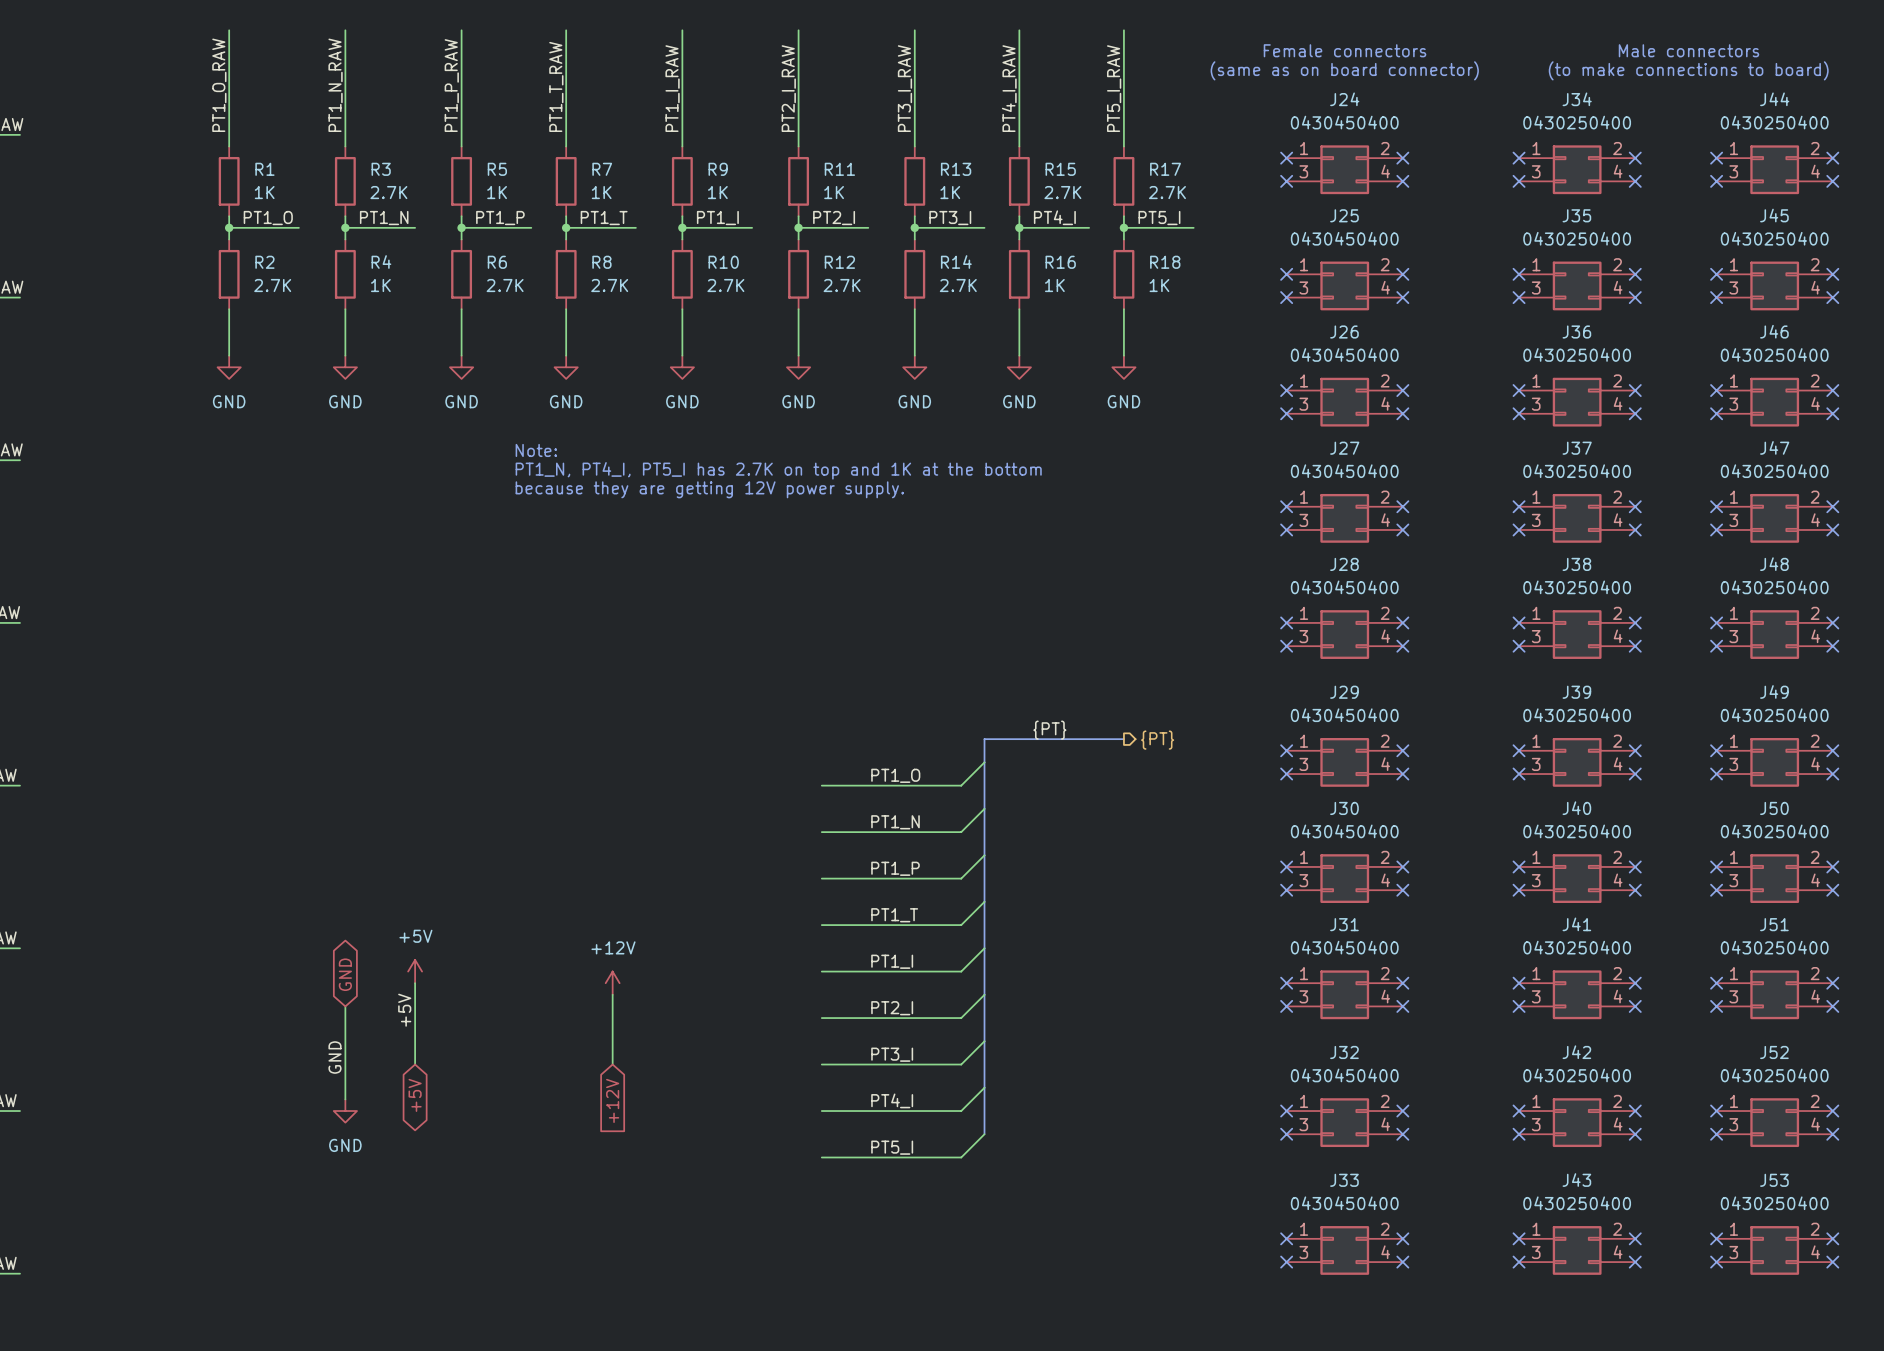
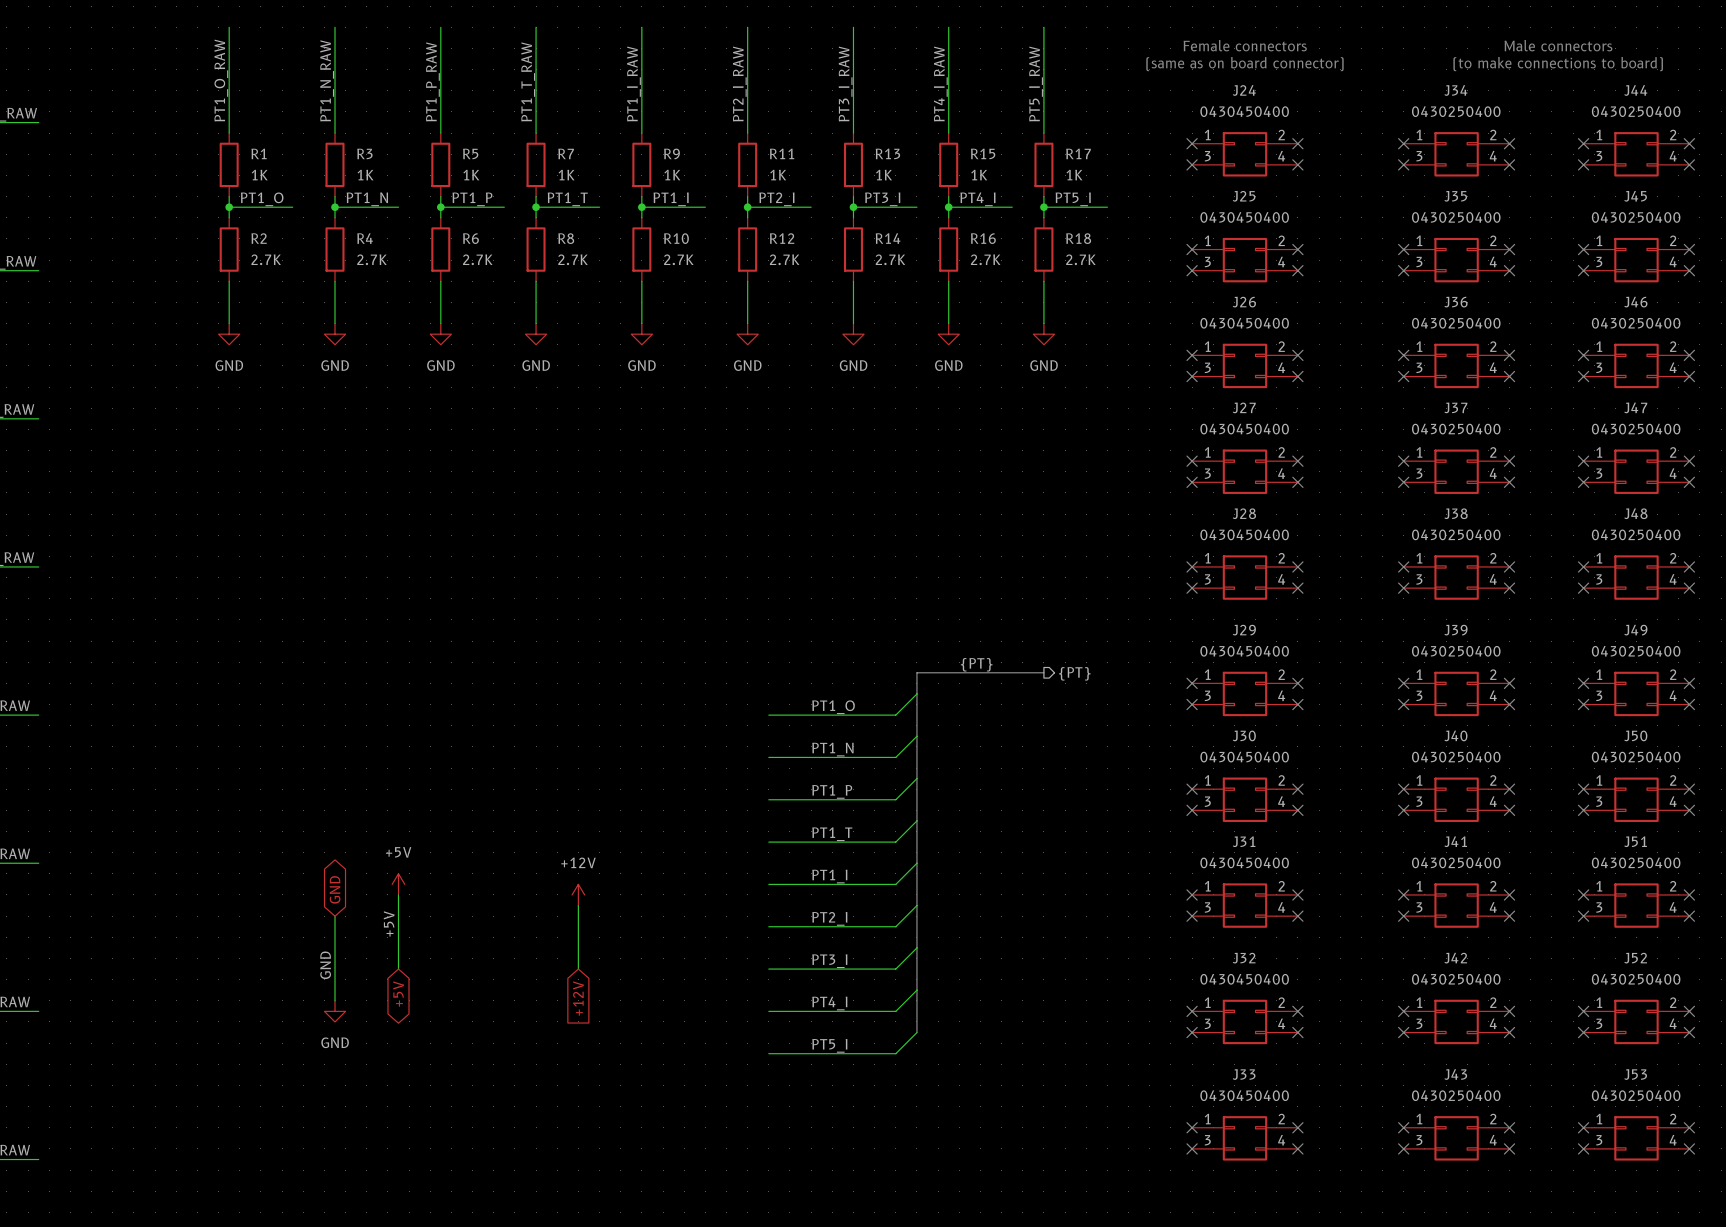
R3 value: 2.7K (388, 192) -> 1K (365, 175)
R15 value: 2.7K (1062, 192) -> 1K (979, 175)
R17 value: 2.7K (1167, 192) -> 1K (1074, 175)
R4 value: 1K (380, 285) -> 2.7K (371, 259)
R16 value: 1K (1054, 285) -> 2.7K (985, 259)
R18 value: 1K (1159, 285) -> 2.7K (1080, 259)
text: Note: (536, 450) -> none
text: PT1_N, PT4_I, PT5_I has 2.7K on top and 1K at the bottom (778, 470) -> none
text: because they are getting 12V power supply. (709, 489) -> none

